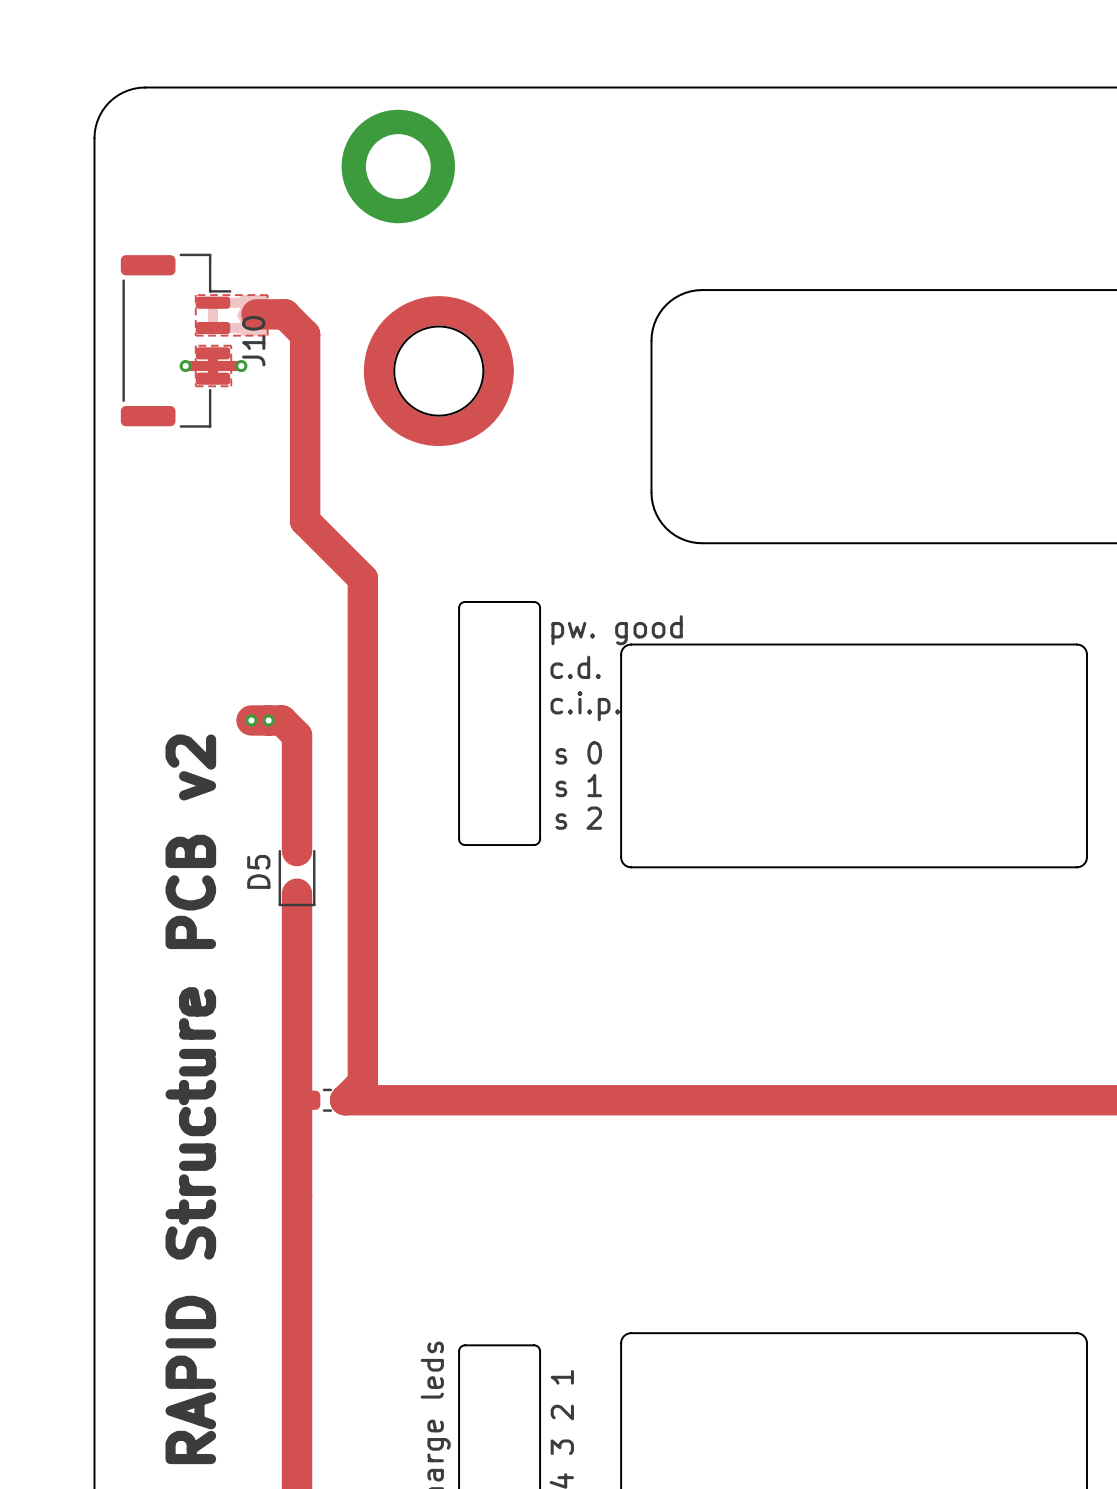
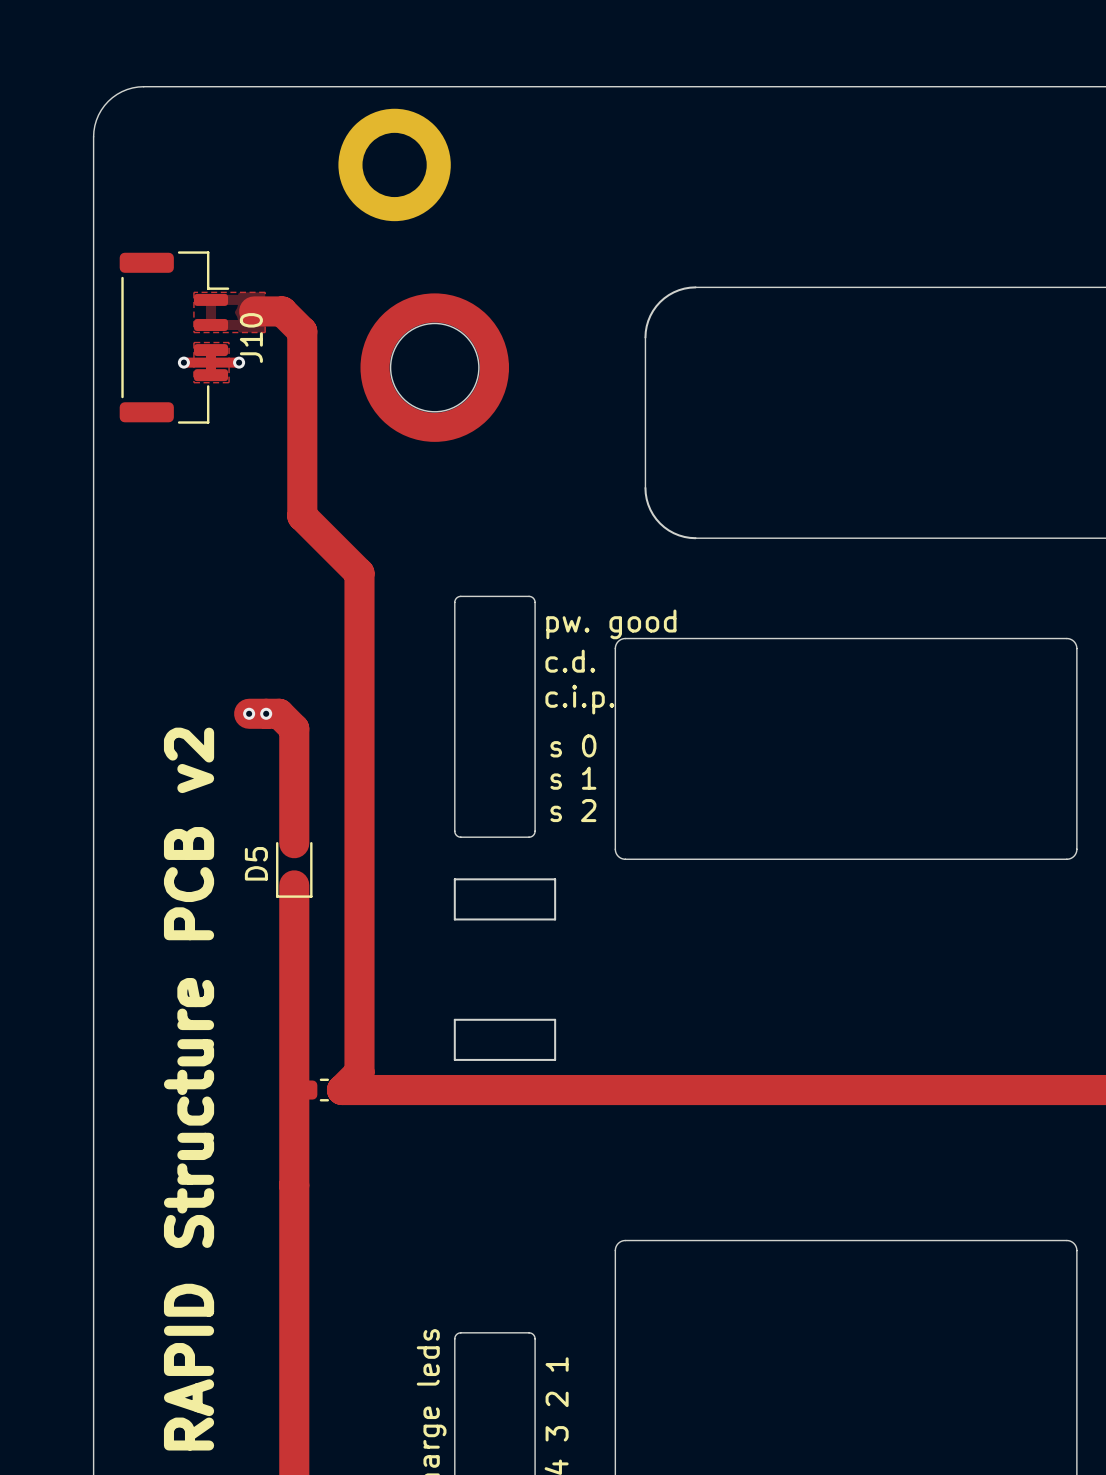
board edge: none -> (454, 879) (555, 879) (555, 919) (454, 919) (454, 879)
board edge: none -> (454, 1019) (454, 1059) (555, 1059) (555, 1019) (454, 1019)
board edge: (621, 1343) (624, 1336) (631, 1333) (1076, 1333) (1084, 1336) (1086, 1343) -> (615, 1330) (615, 1249) (619, 1242) (625, 1240) (1069, 1240) (1074, 1244) (1076, 1249) (1076, 1330)

